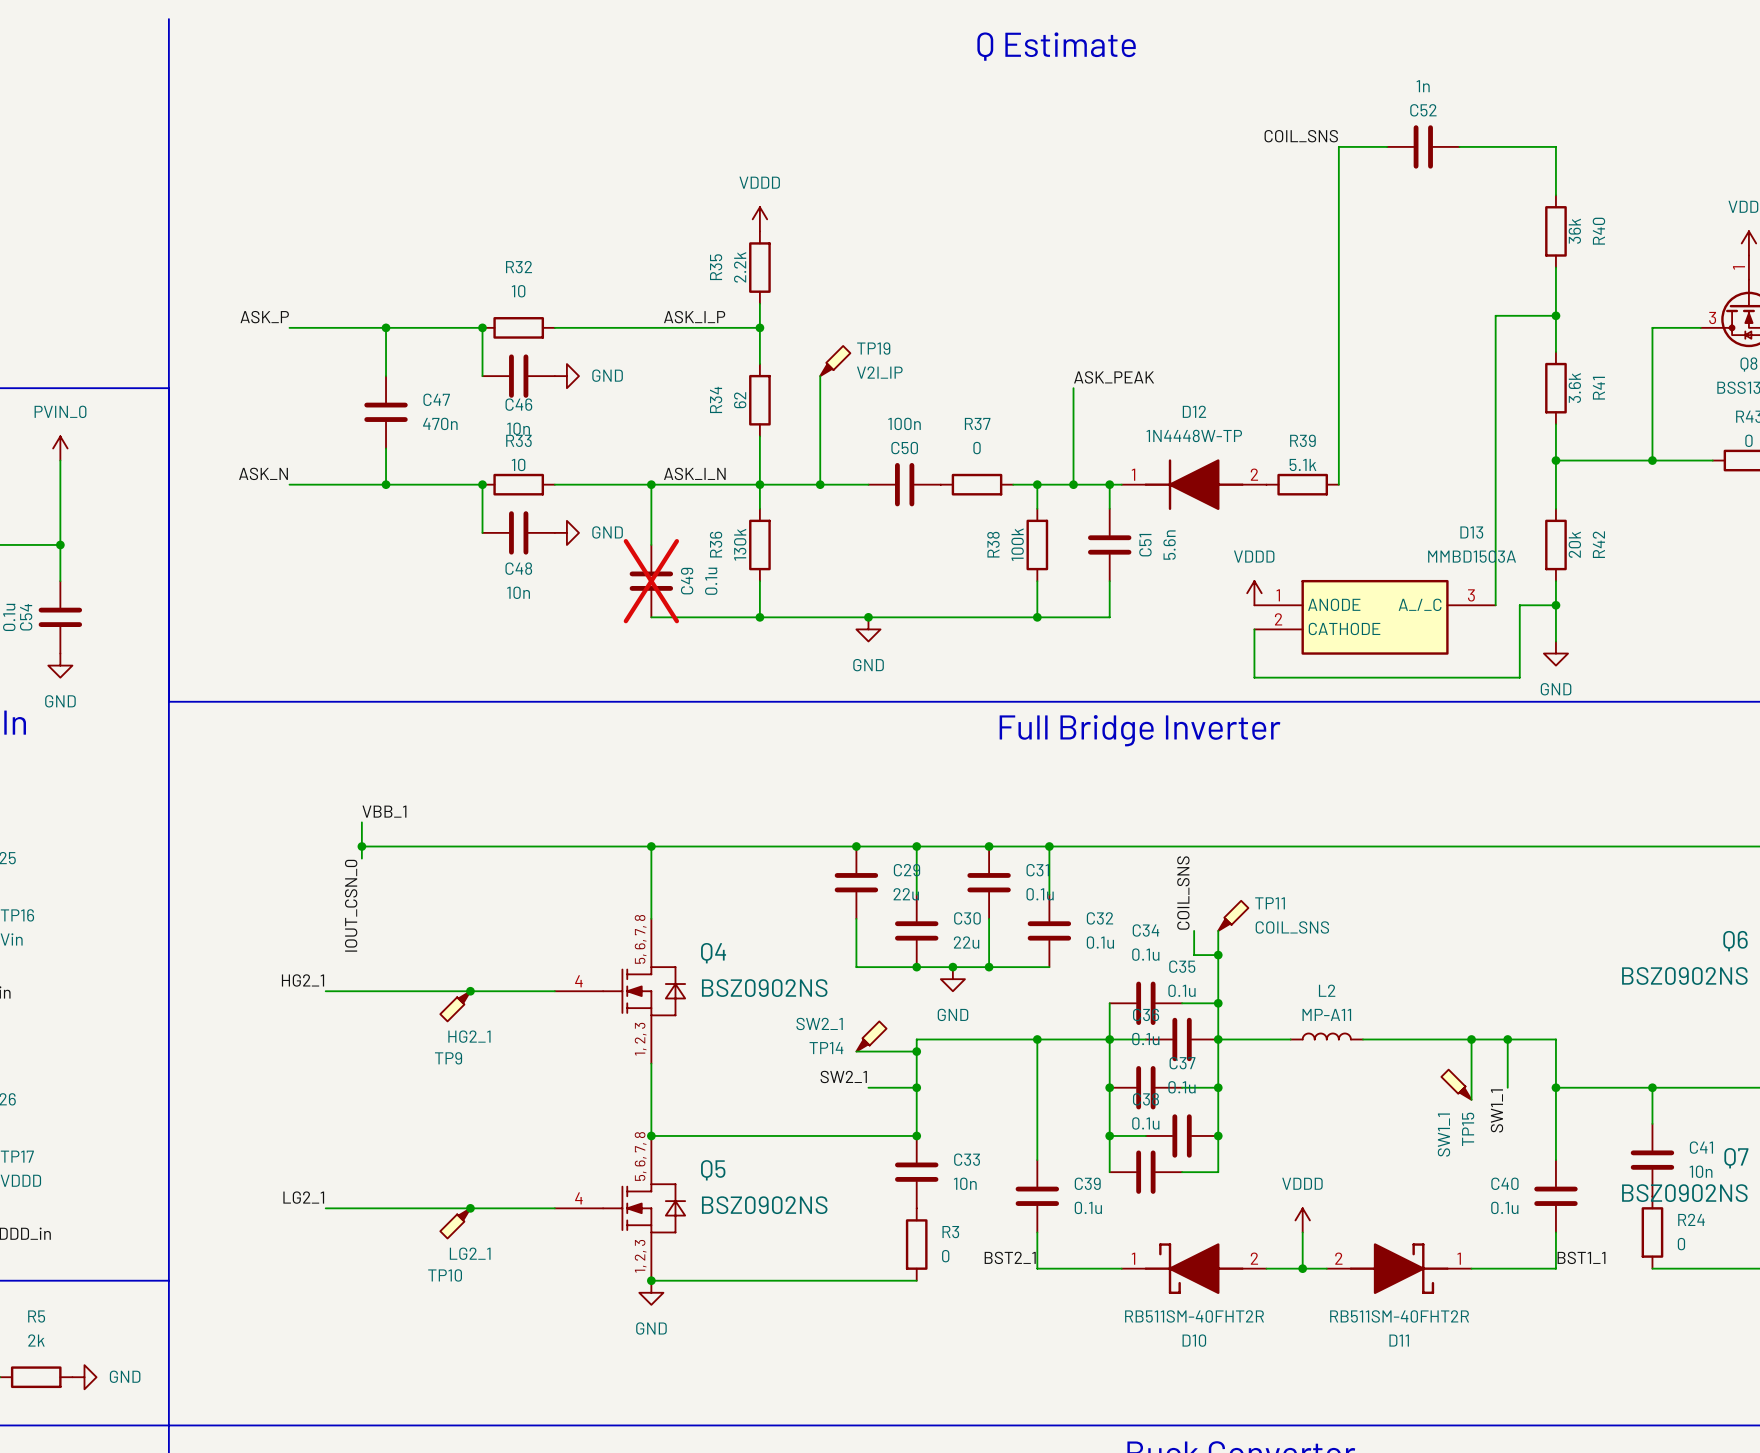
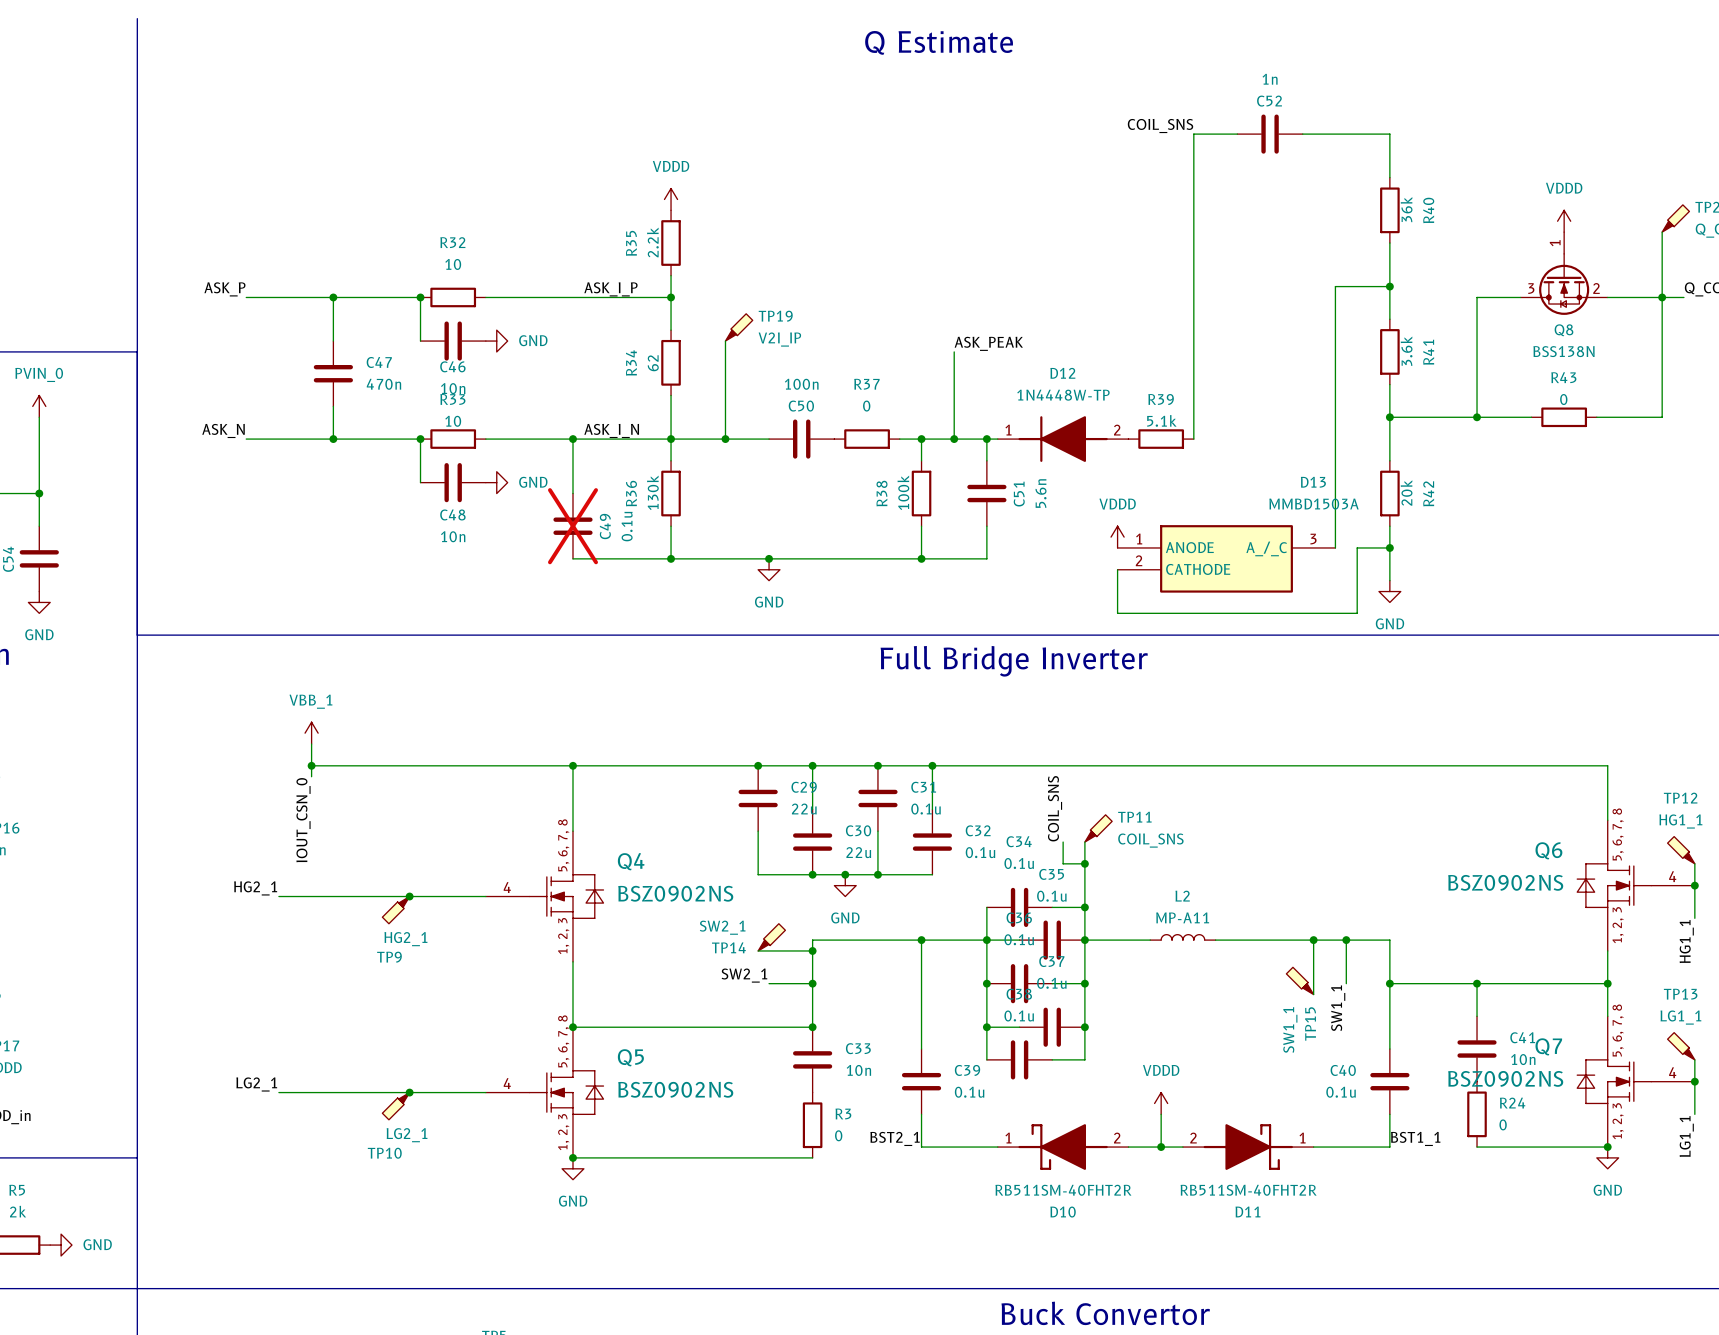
power symbol: none -> VBB_1 (311, 733)
label: VBB_1 (384, 811) -> none

